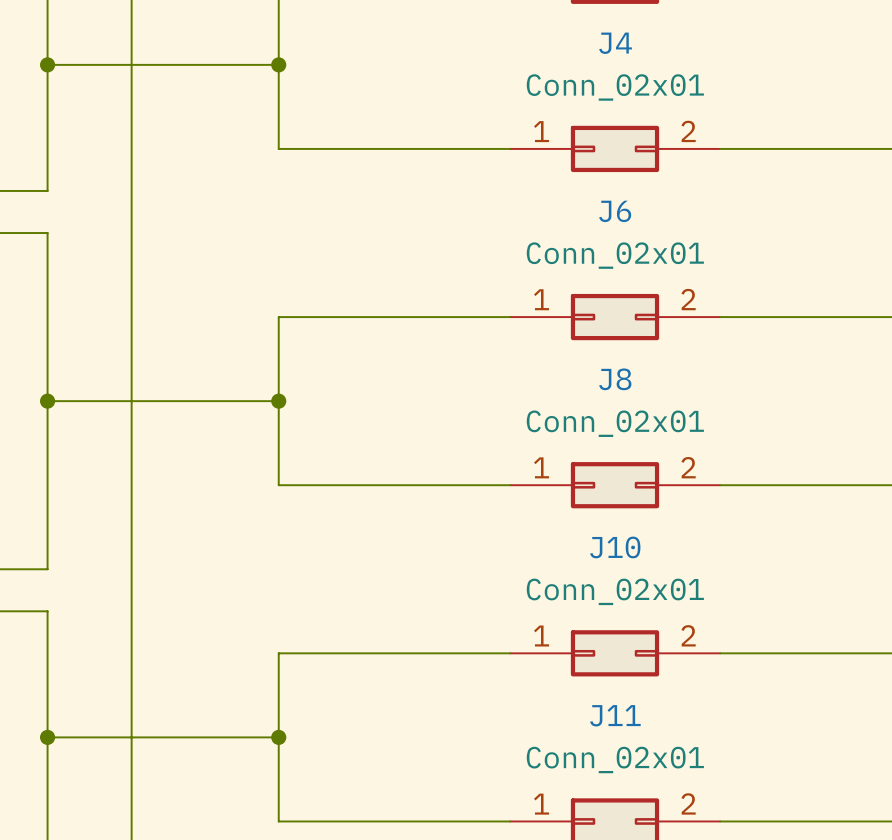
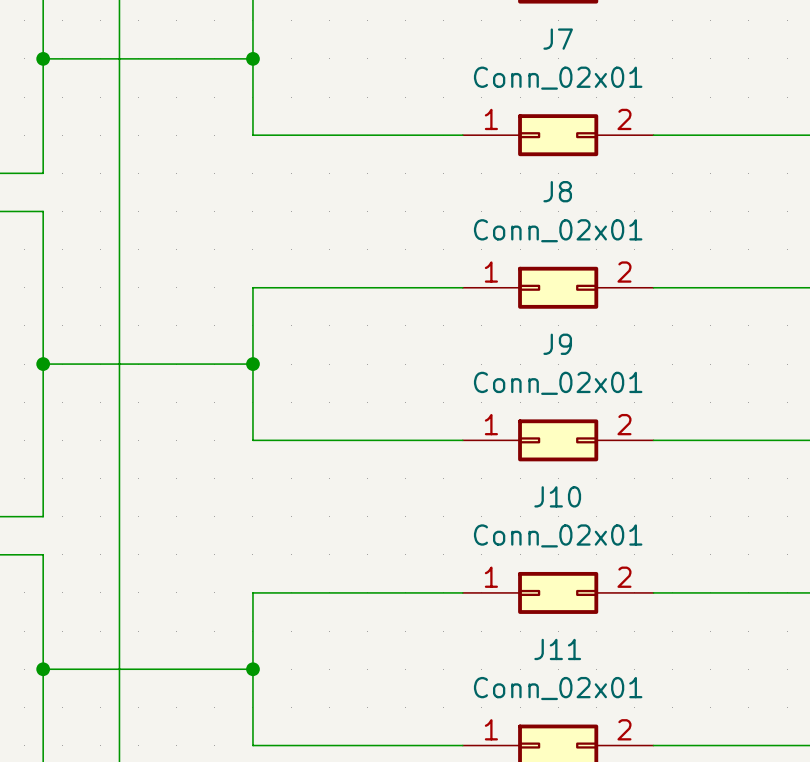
J4 name: J4 (615, 43) -> J7 (558, 39)
J6 name: J6 (615, 211) -> J8 (557, 191)
J8 name: J8 (615, 379) -> J9 (557, 344)

